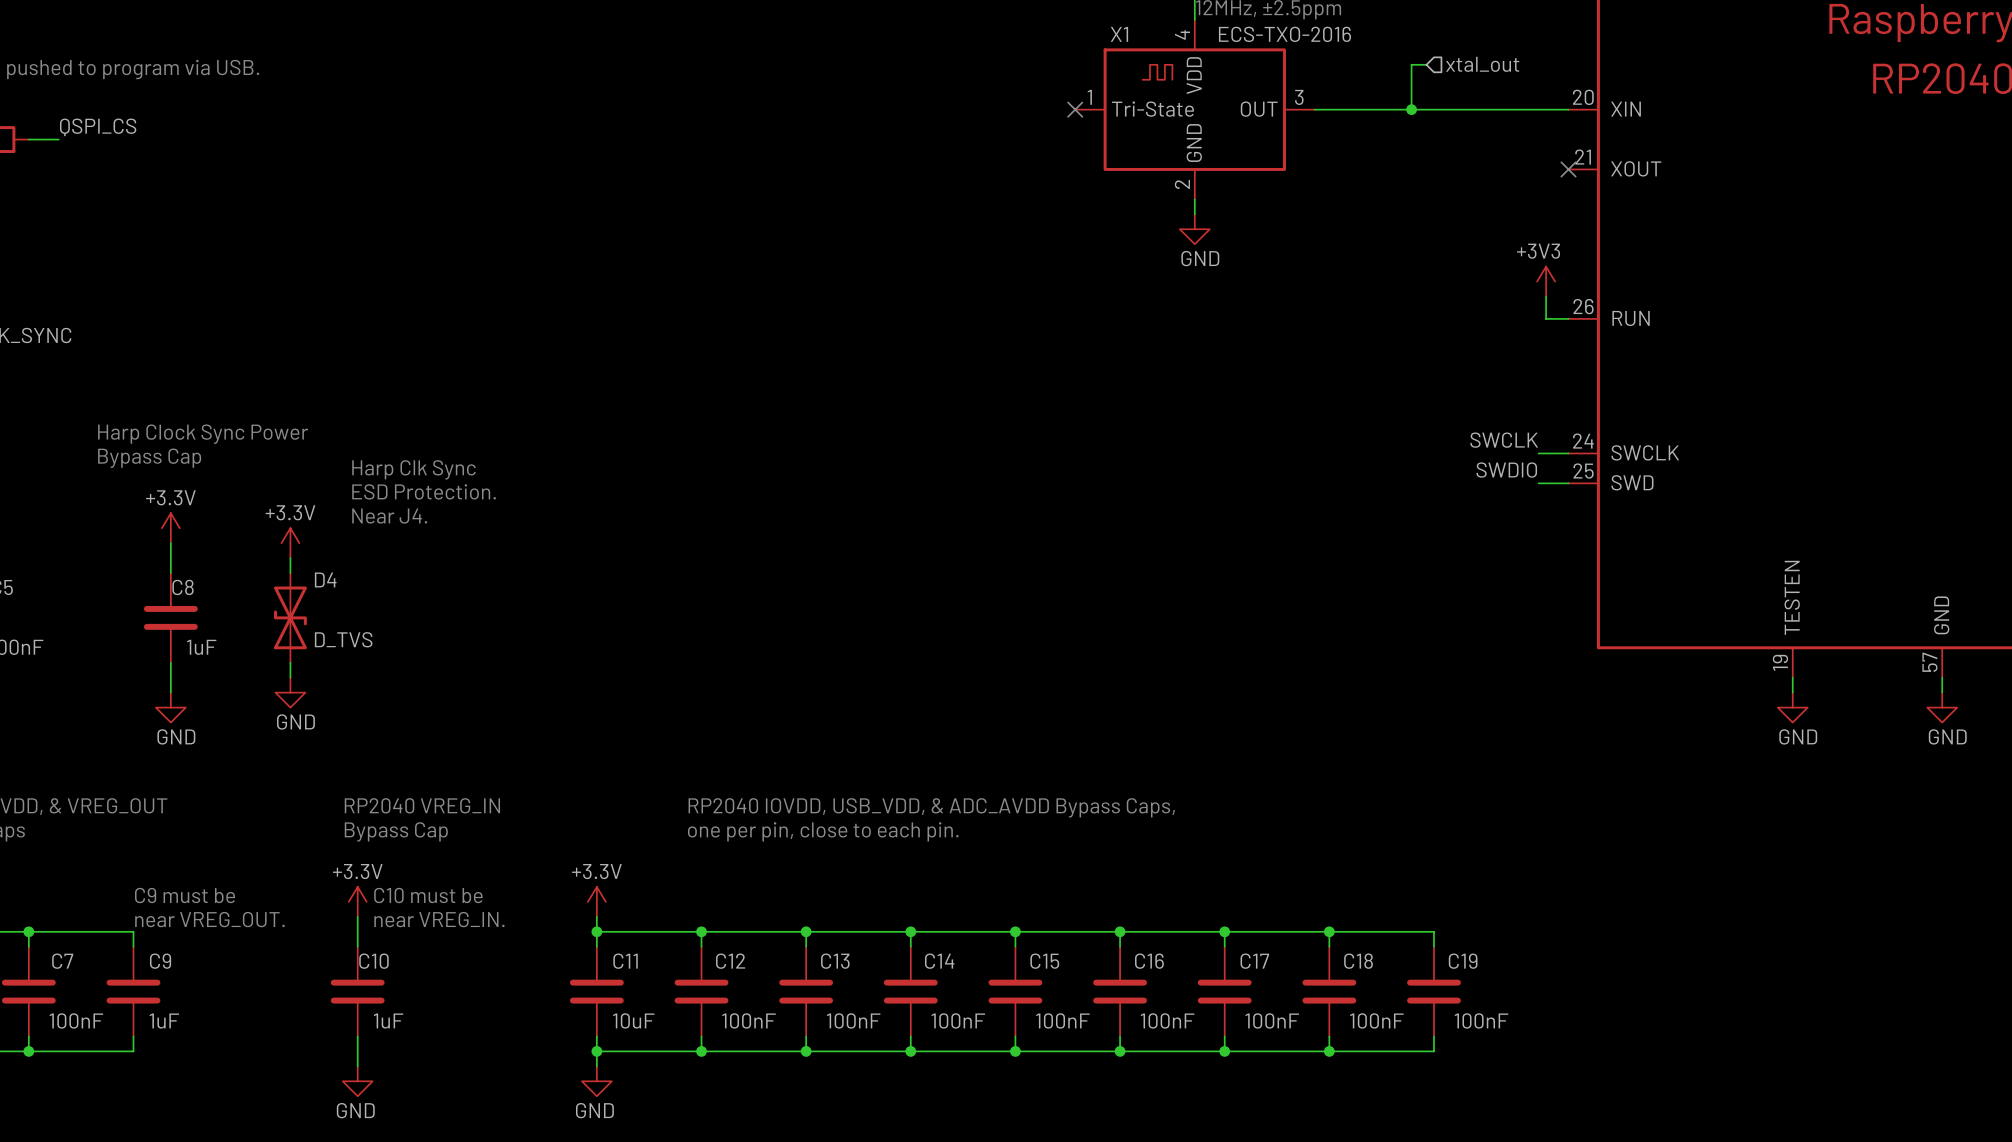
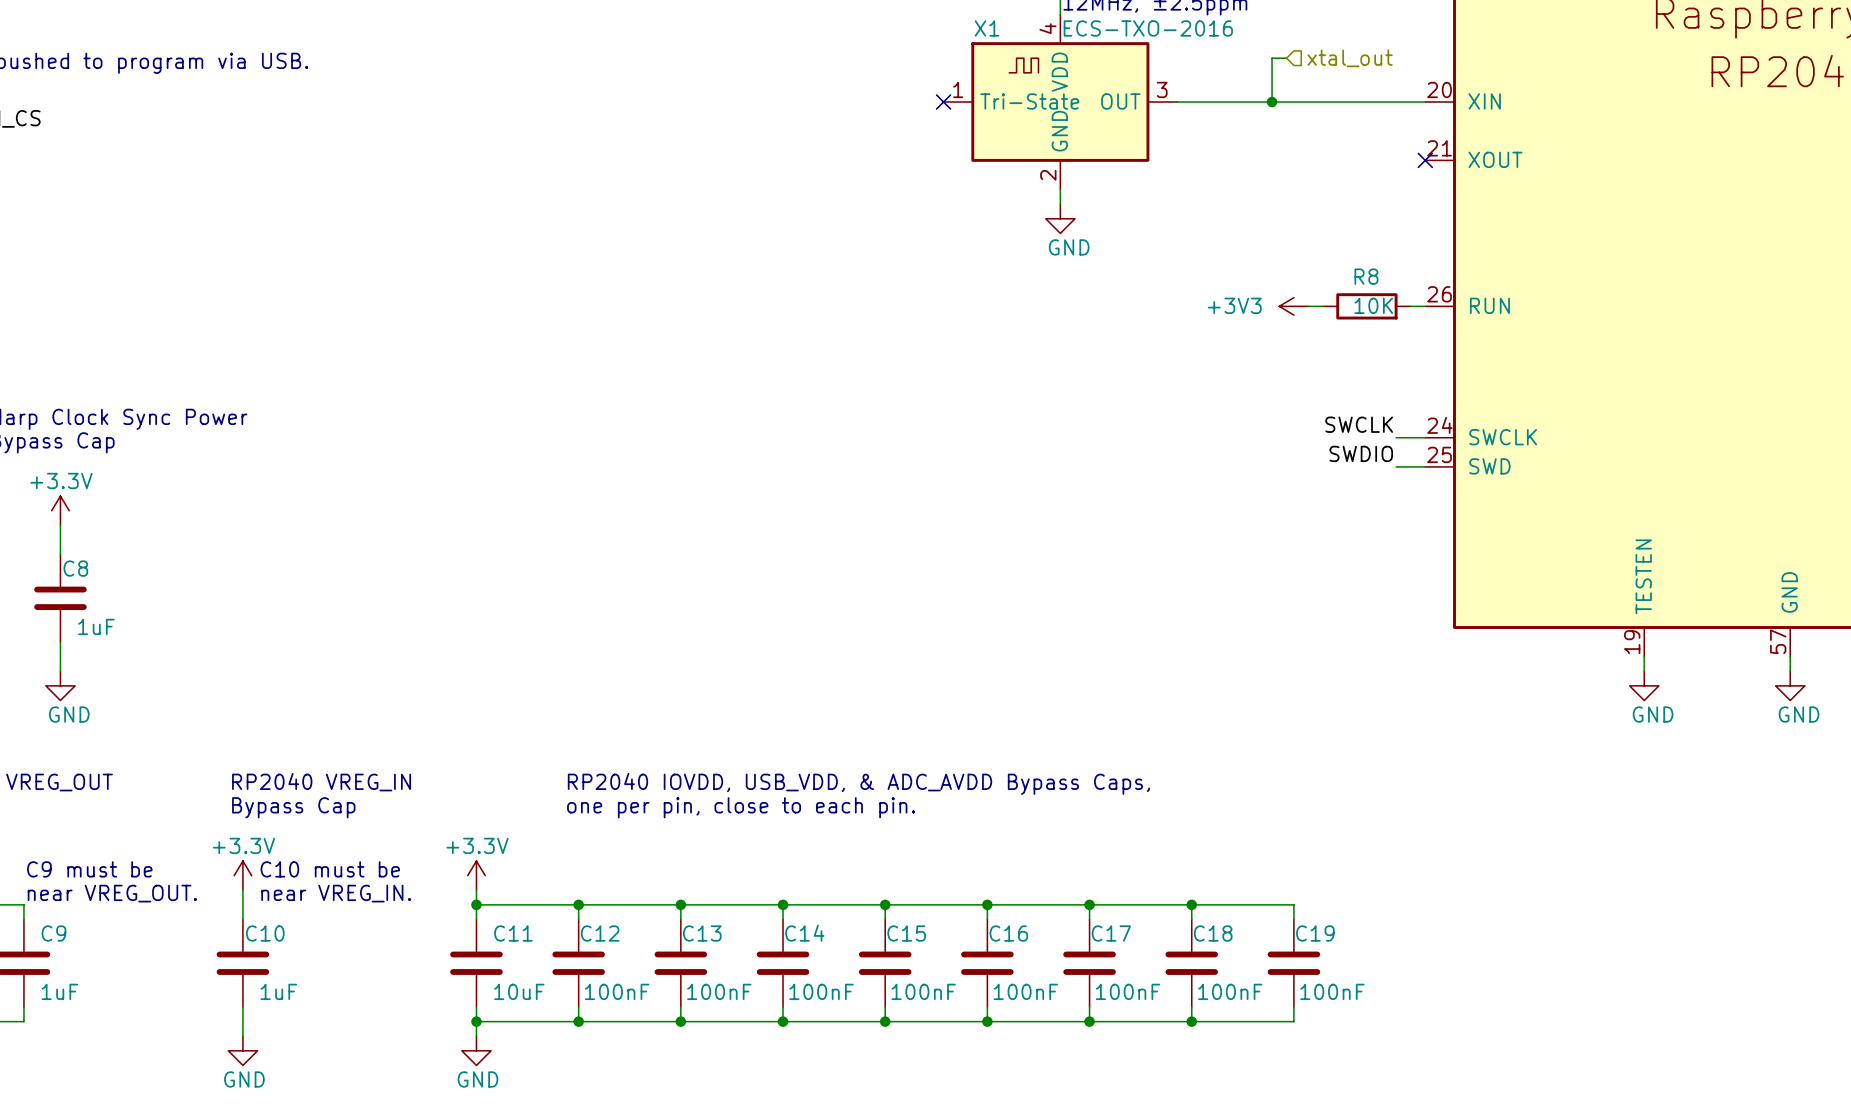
power symbol text position: +3V3 (1538, 251) -> +3V3 (1234, 305)
power symbol rotation: 0° (1546, 281) -> 90° counterclockwise (1293, 306)
power symbol position: +3V3 (1546, 281) -> +3V3 (1293, 306)
wire: (1546, 296) (1546, 318) (1553, 318) -> none
wire: none -> (1308, 306) (1323, 306)
R8: none -> 10K (1366, 306)
text: Harp Clk Sync (413, 469) -> none
text: ESD Protection. (424, 491) -> none
text: Near J4. (389, 516) -> none
power symbol: +3.3V (290, 543) -> none
wire: (290, 558) (290, 573) -> none
D4: D_TVS (290, 617) -> none
wire: (290, 662) (290, 677) -> none
power symbol: GND (290, 692) -> none

